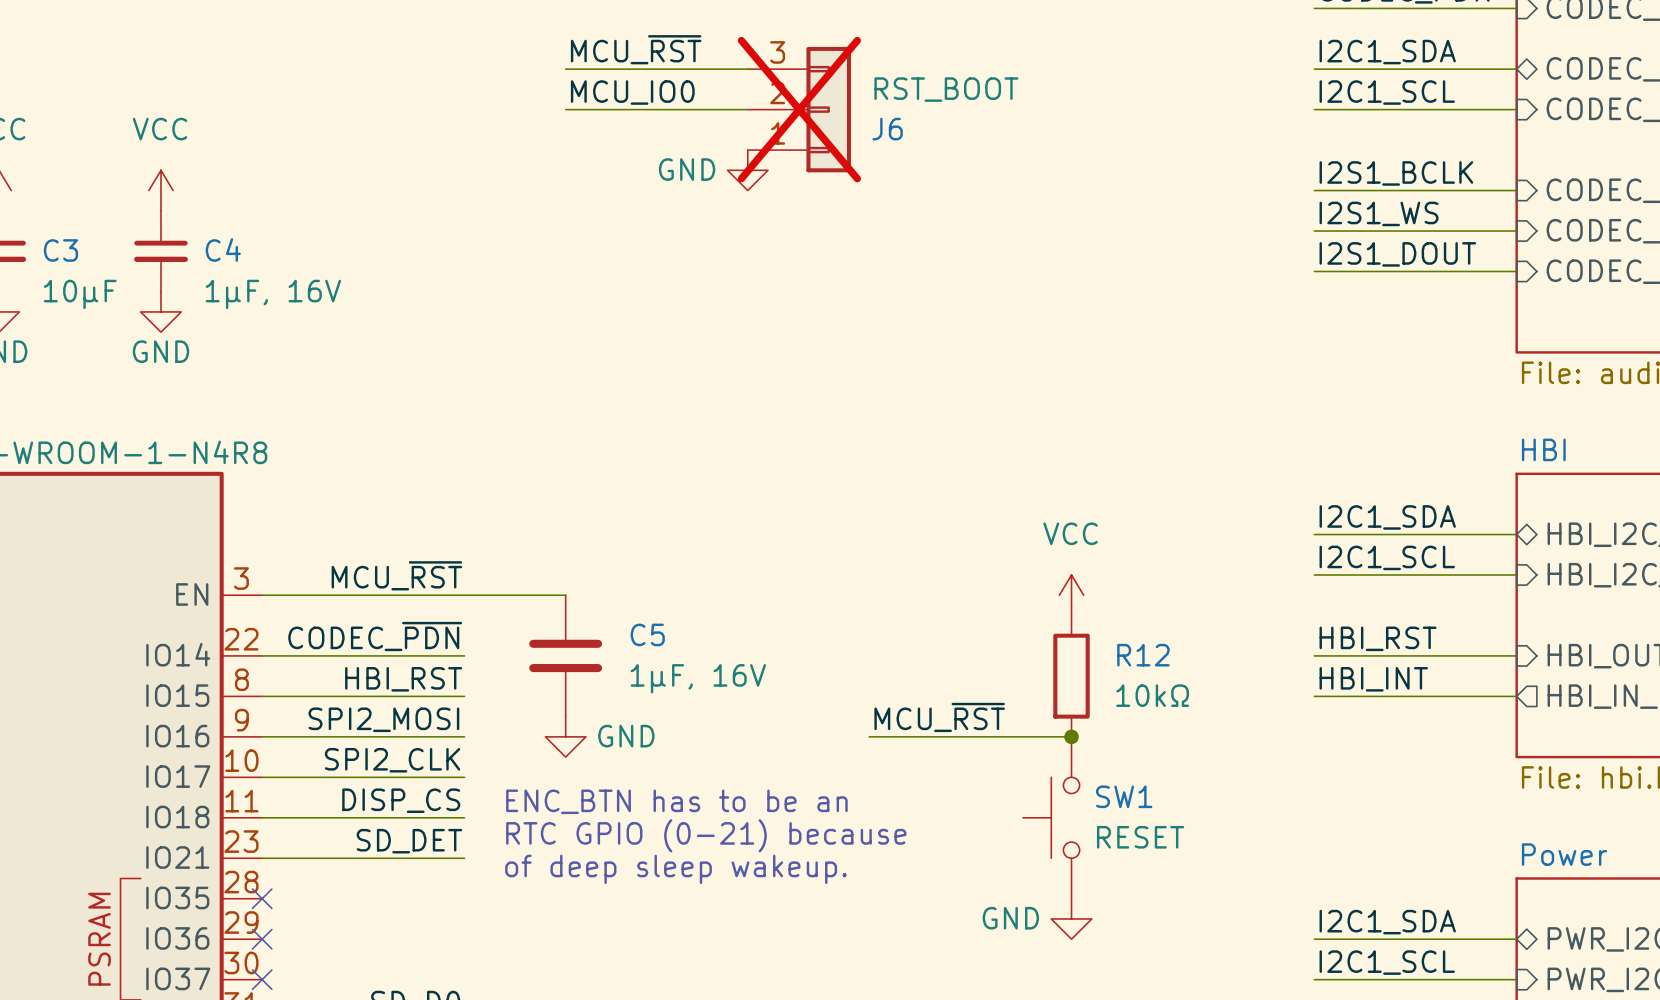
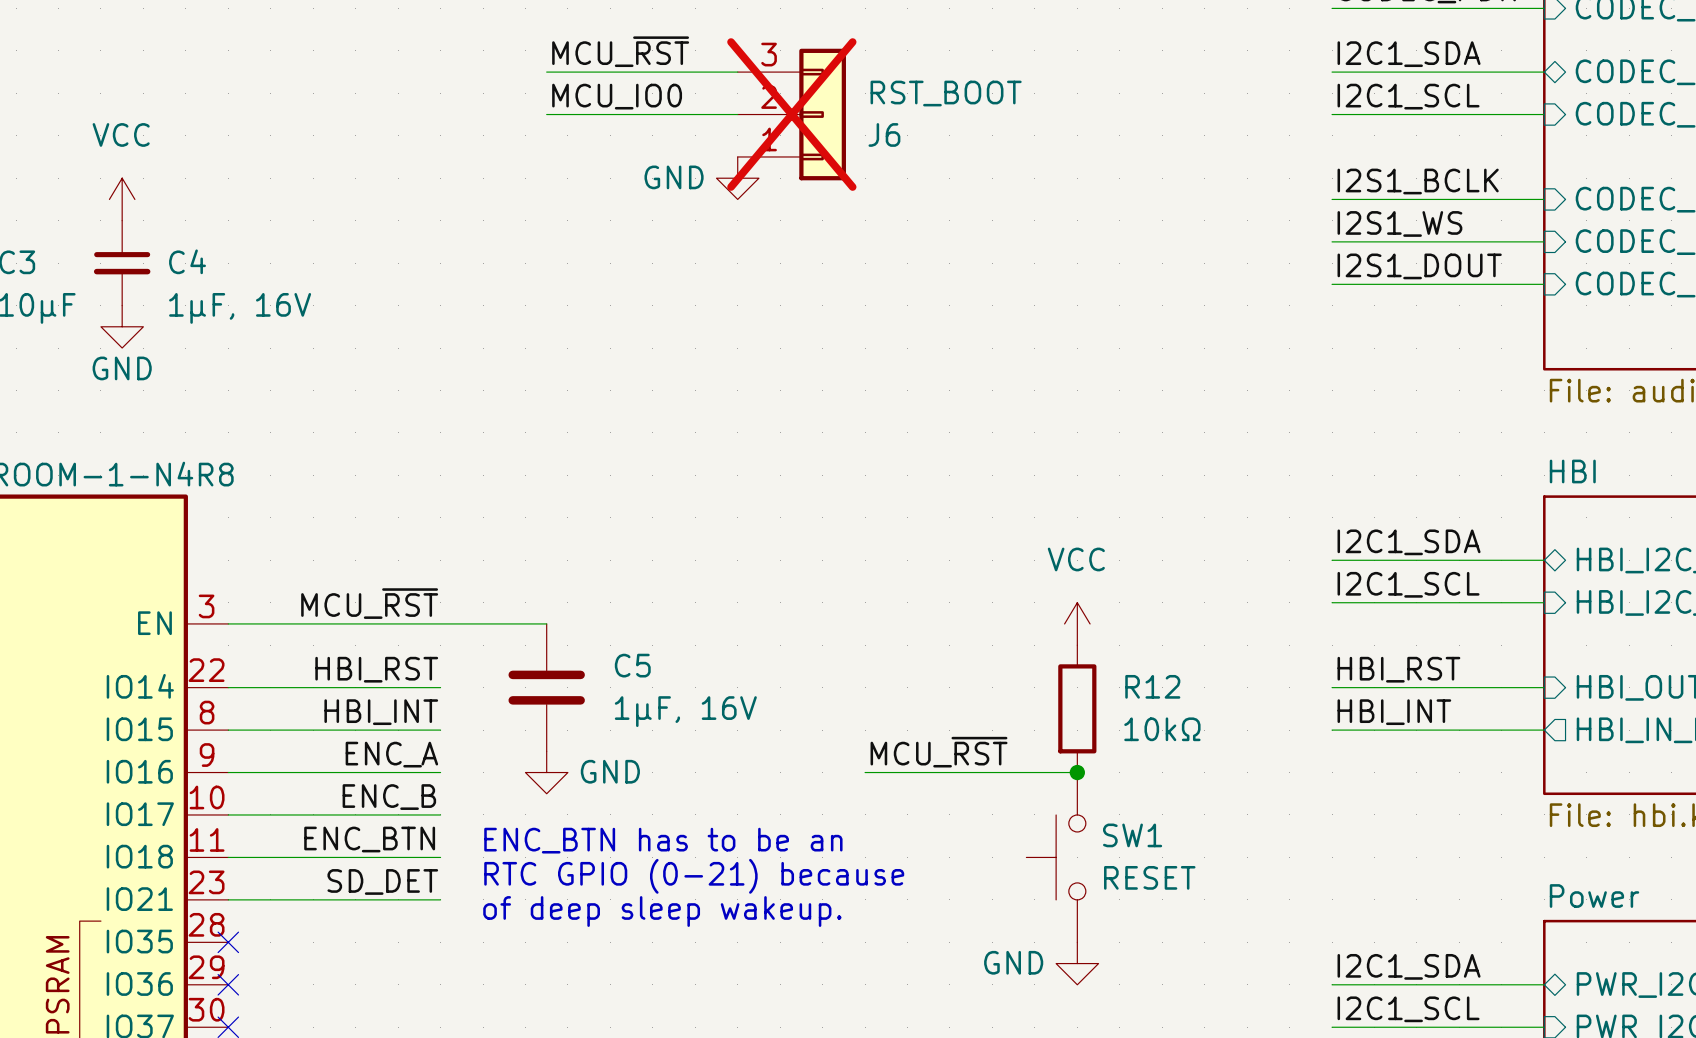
label: CODEC_~{PDN} (375, 636) -> HBI_RST (376, 669)
label: HBI_RST (403, 679) -> HBI_INT (381, 712)
label: SPI2_MOSI (383, 719) -> ENC_A (391, 754)
label: SPI2_CLK (392, 760) -> ENC_B (389, 797)
label: DISP_CS (401, 800) -> ENC_BTN (369, 839)

